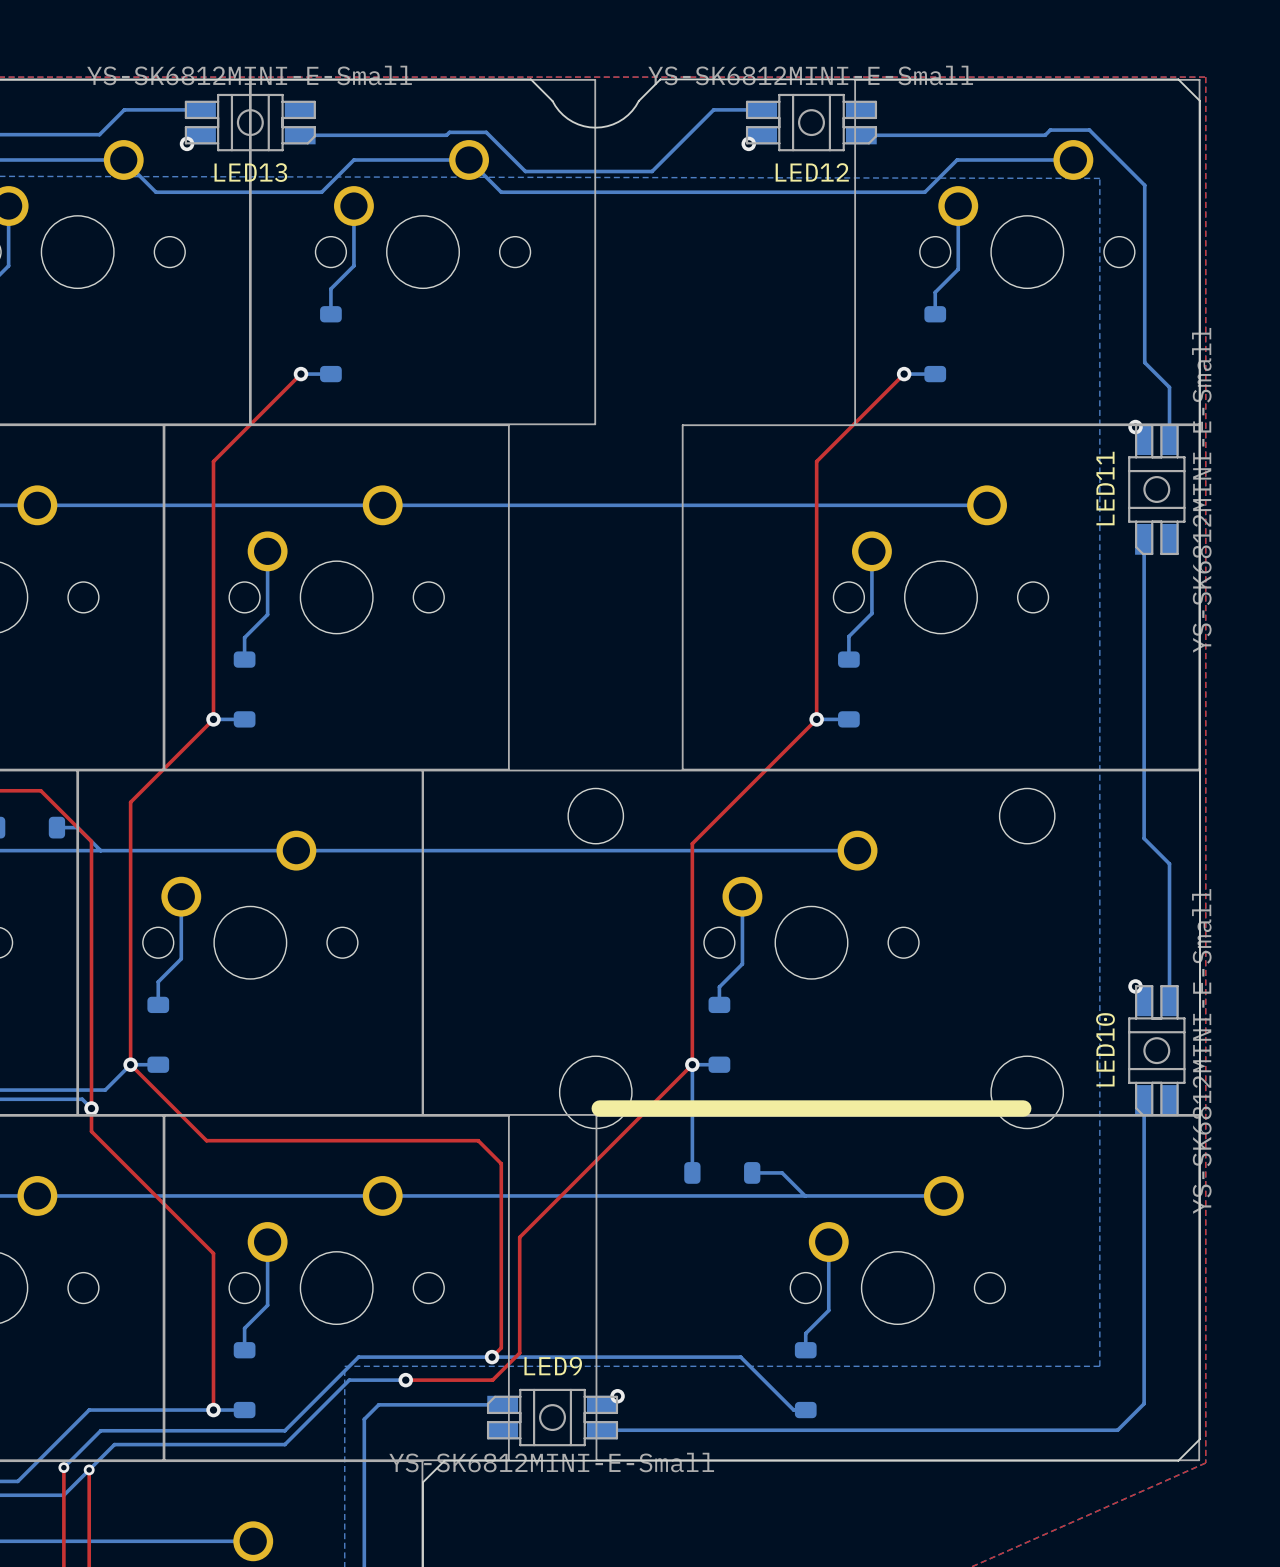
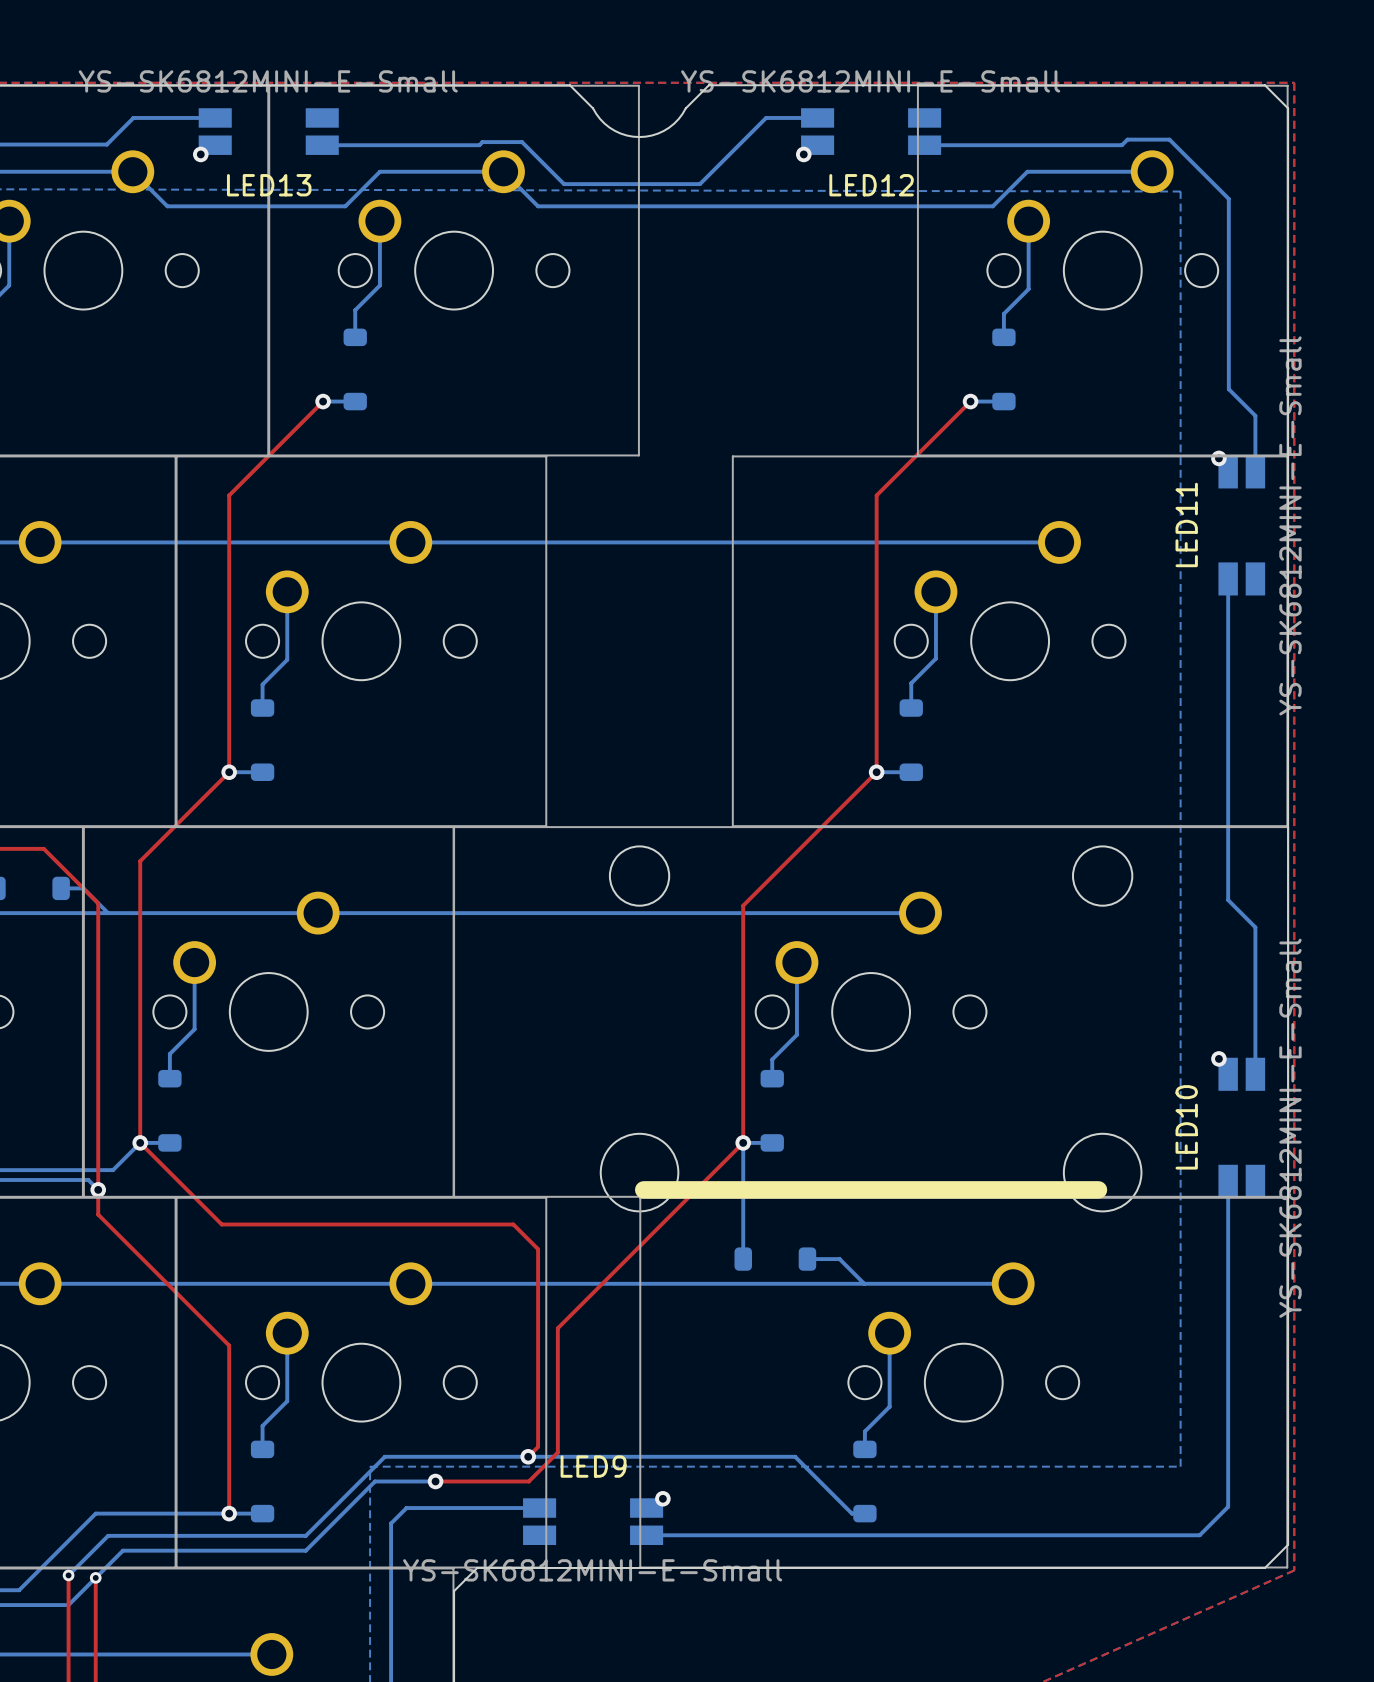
LED13 footprint: [184, 93, 316, 152] -> [198, 101, 339, 162]
LED12 footprint: [745, 93, 878, 152] -> [801, 101, 942, 162]
LED11 footprint: [1127, 423, 1186, 556] -> [1211, 455, 1272, 596]
LED10 footprint: [1127, 985, 1186, 1117] -> [1211, 1057, 1272, 1198]
LED9 footprint: [486, 1388, 619, 1447] -> [523, 1491, 664, 1552]

